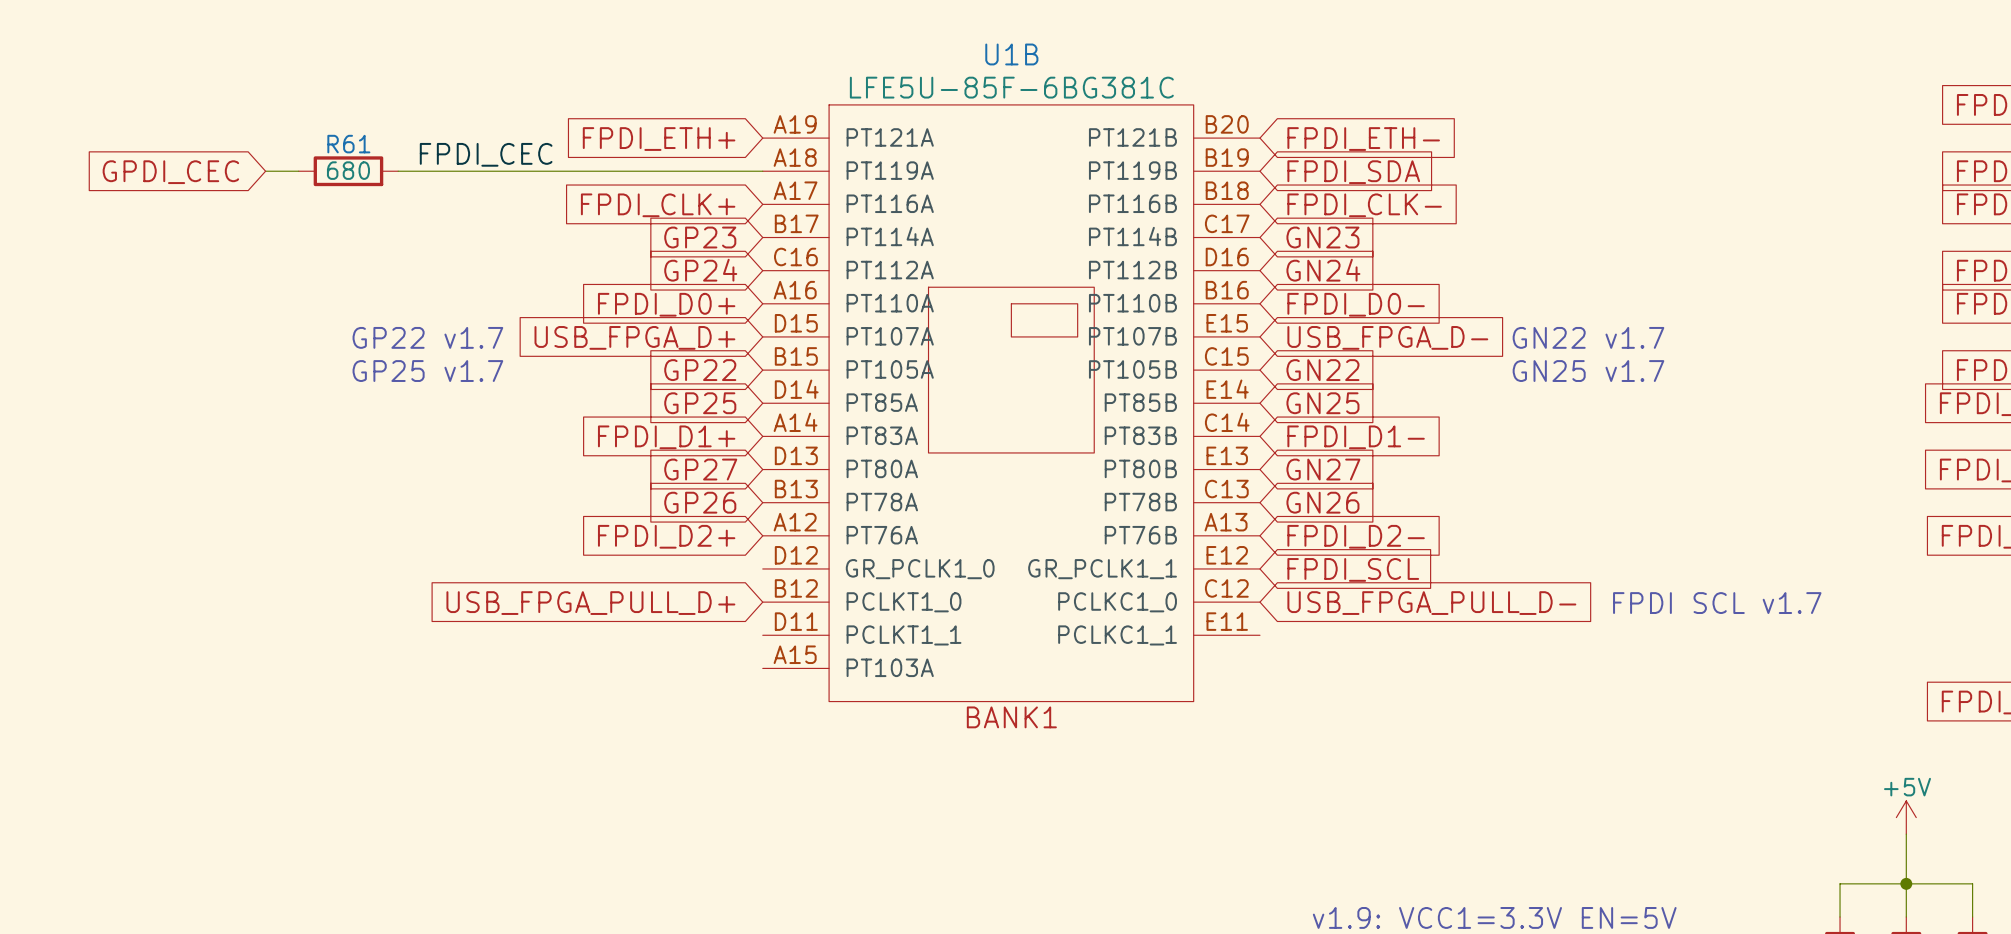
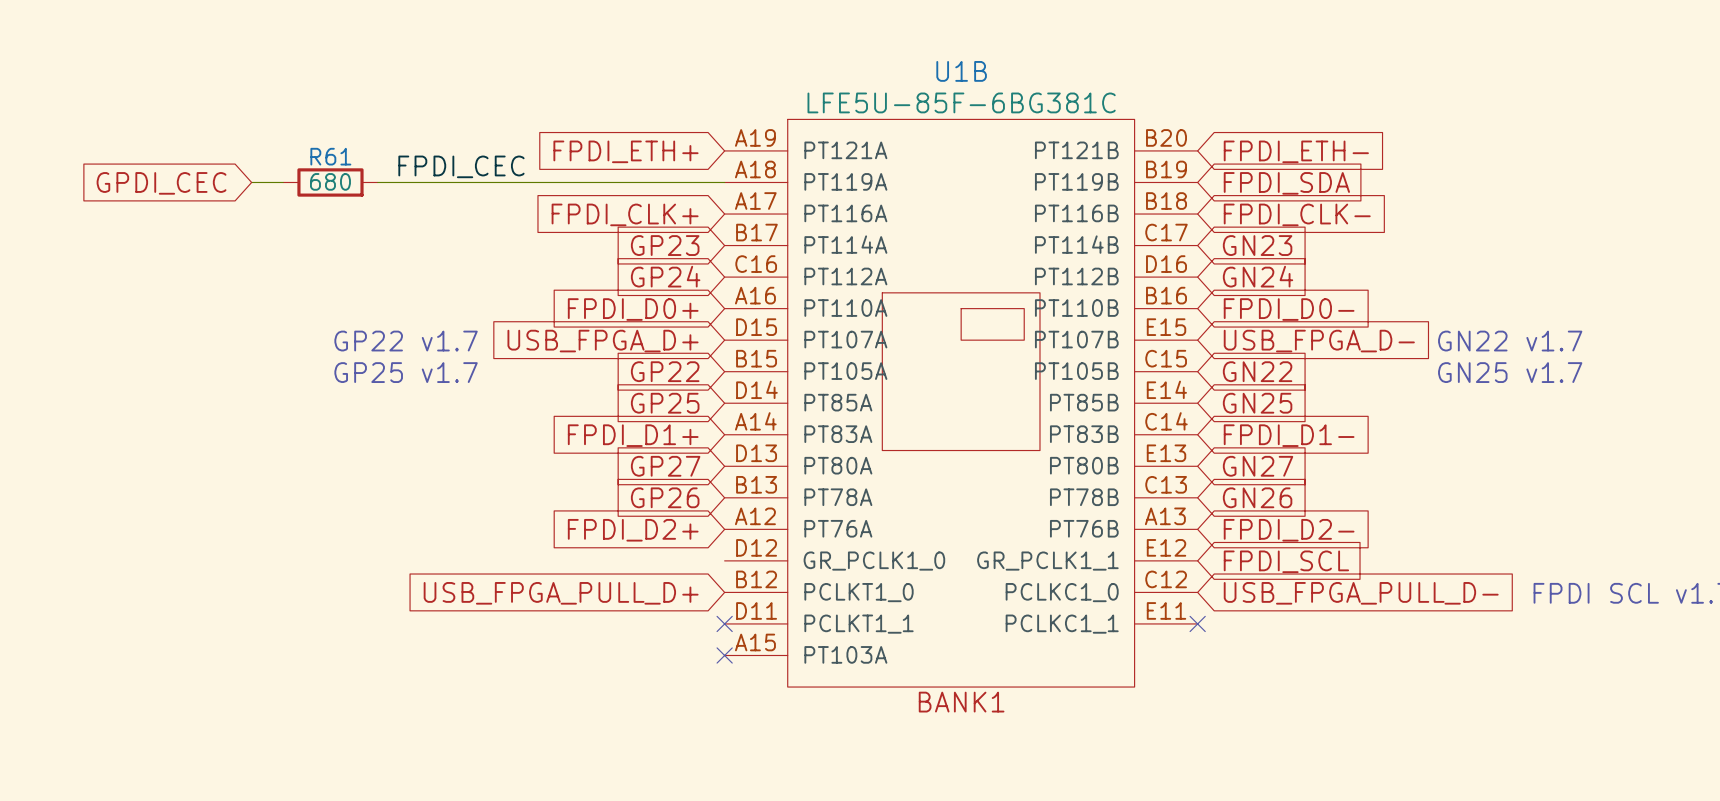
no-connect mark: none -> (724, 623)
no-connect mark: none -> (1197, 623)
no-connect mark: none -> (724, 655)

